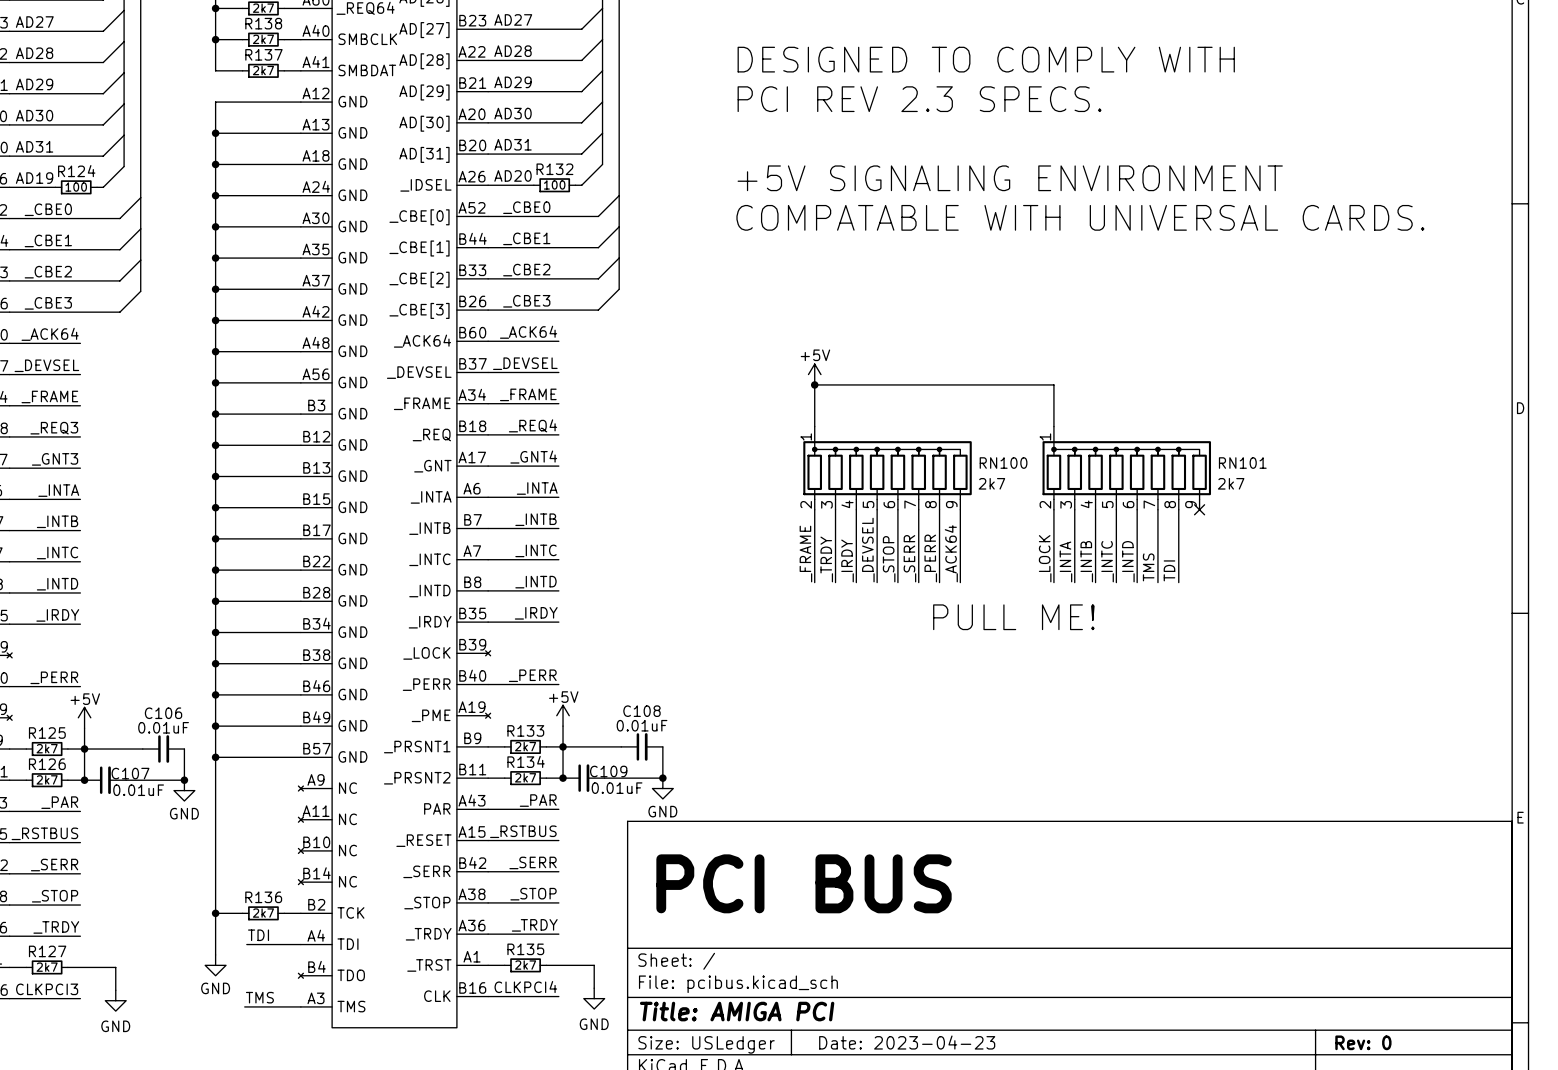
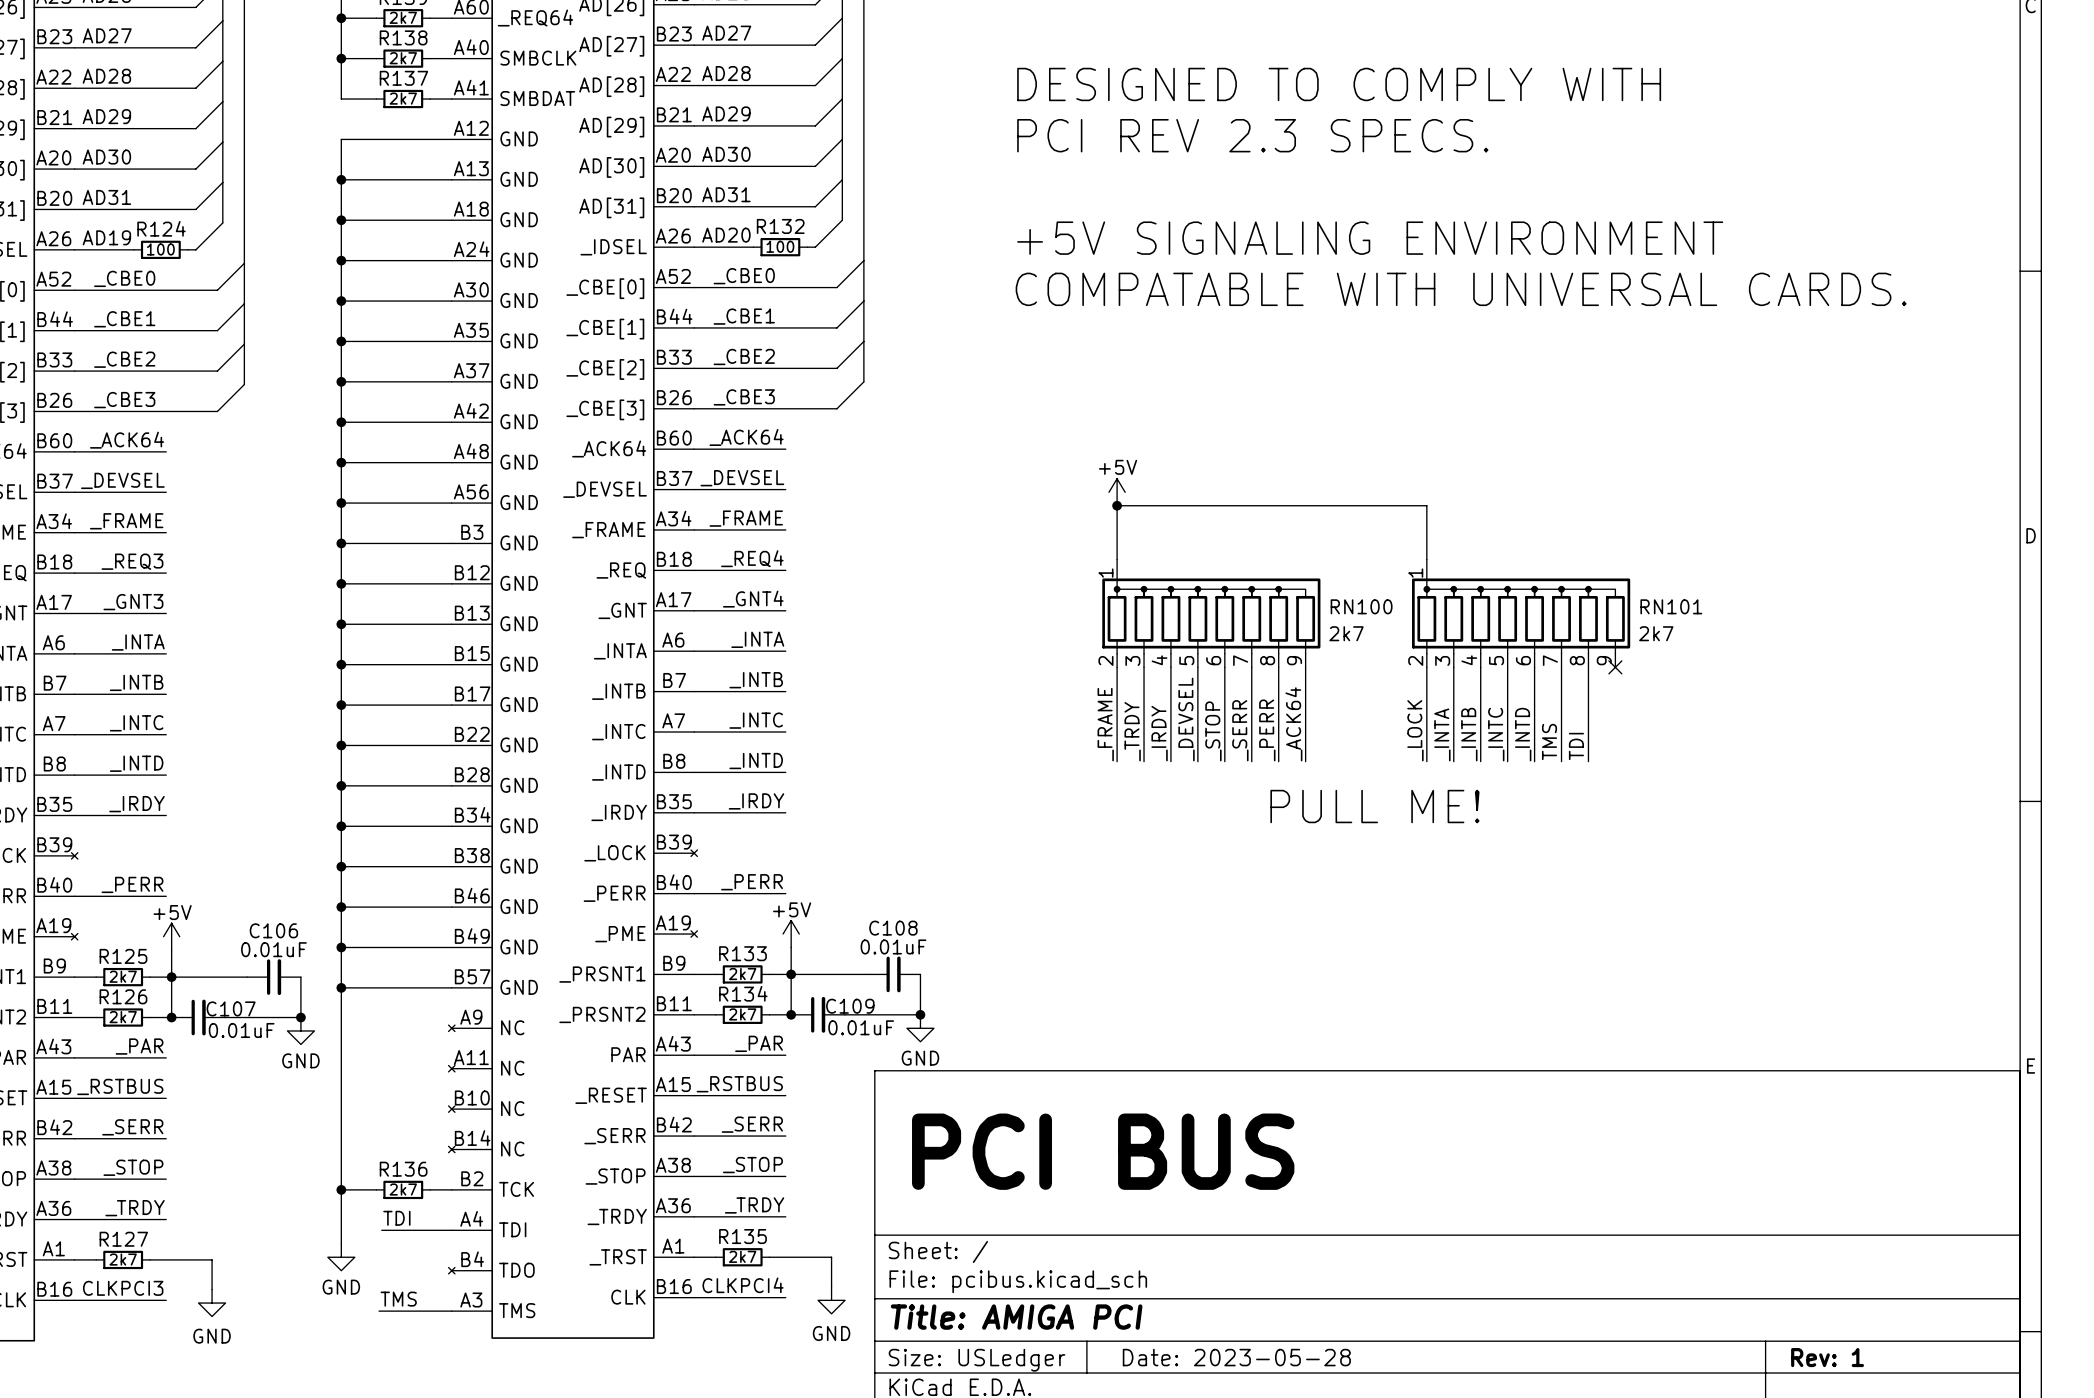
title block: Date: 2023-04-23 (907, 1042) -> Date: 2023-05-28 (1236, 1357)
title block: Rev: 0 (1363, 1042) -> Rev: 1 (1827, 1357)

